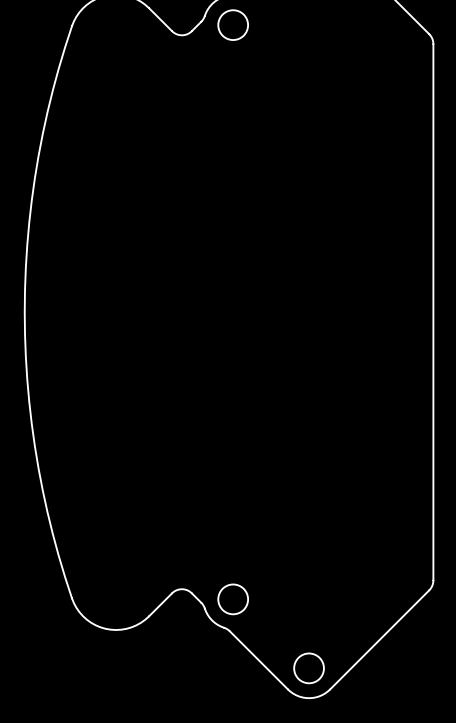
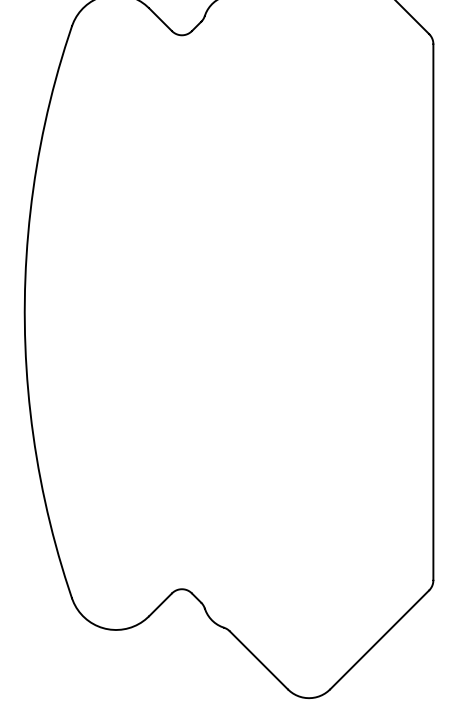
round board edge: [217, 9, 250, 41] -> none
round board edge: [217, 583, 250, 616] -> none
round board edge: [293, 652, 325, 685] -> none

